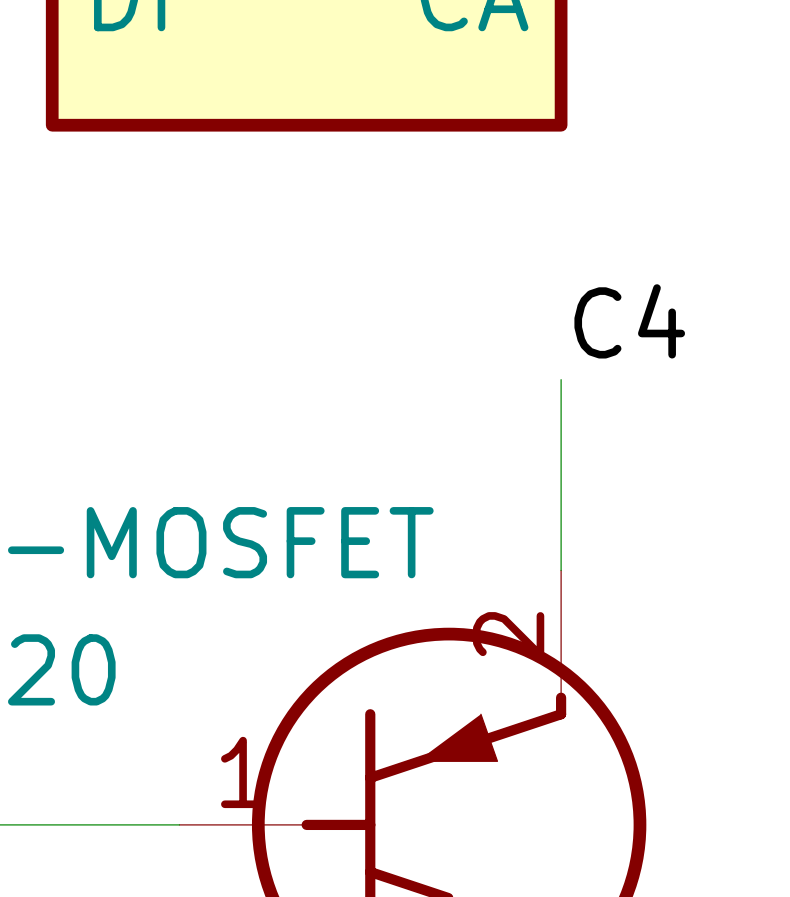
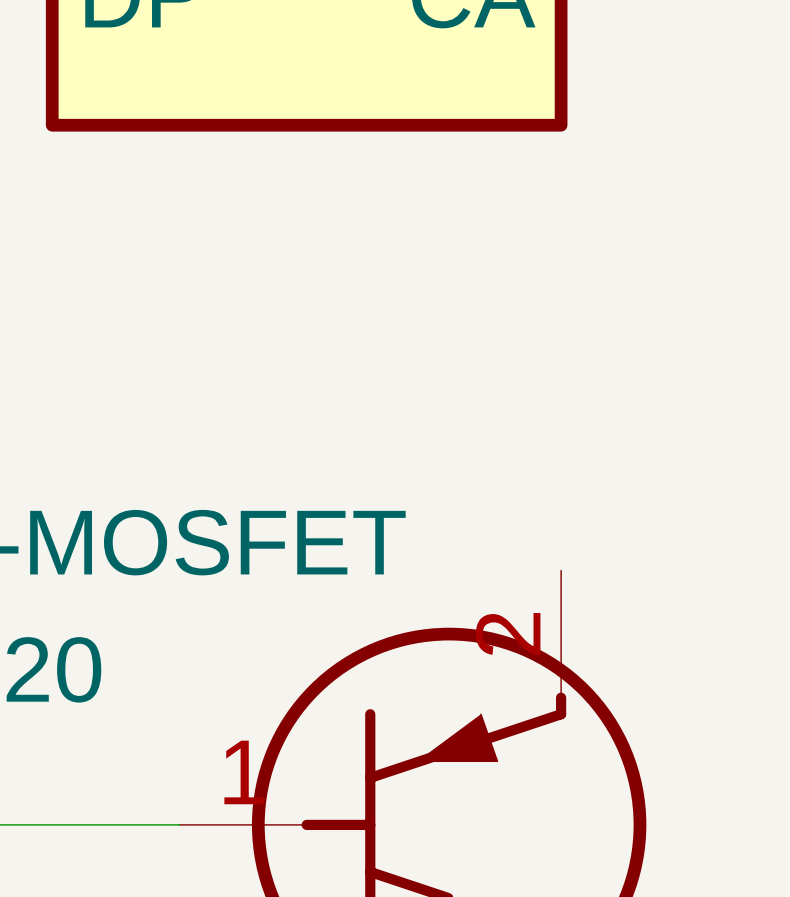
label: C4 (629, 321) -> none
wire: (561, 379) (561, 570) -> none

